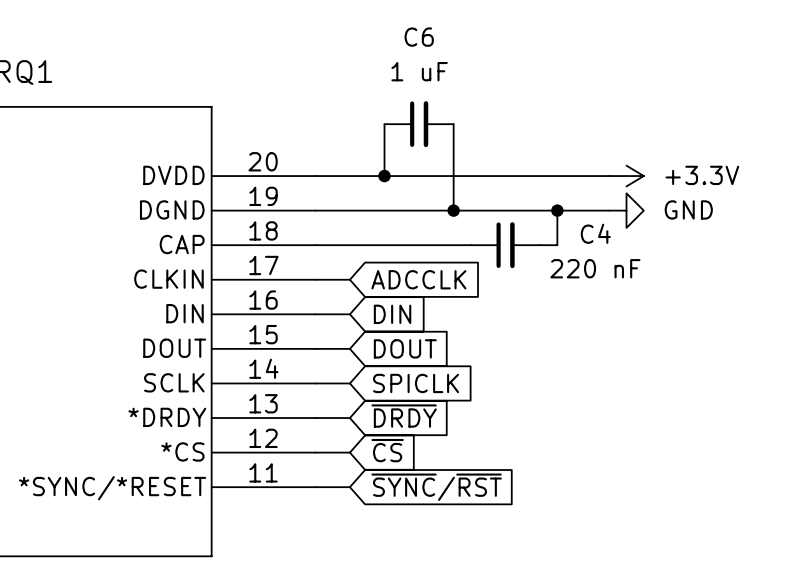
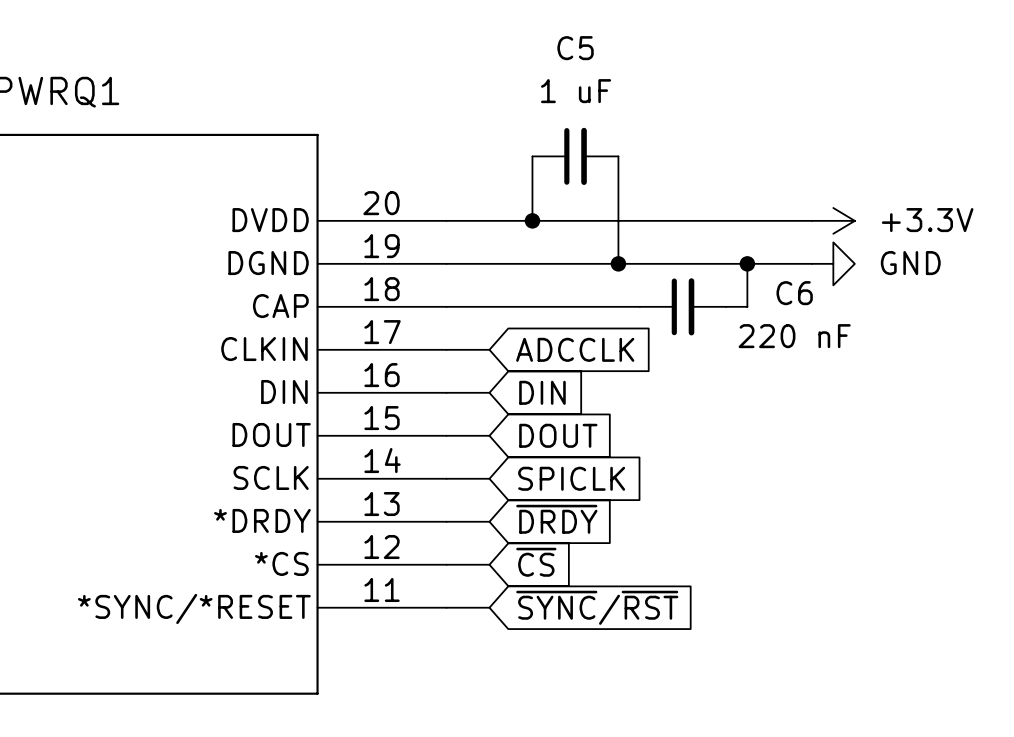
C6 name: C6 (419, 37) -> C5 (575, 48)
C4 name: C4 (595, 233) -> C6 (794, 293)

